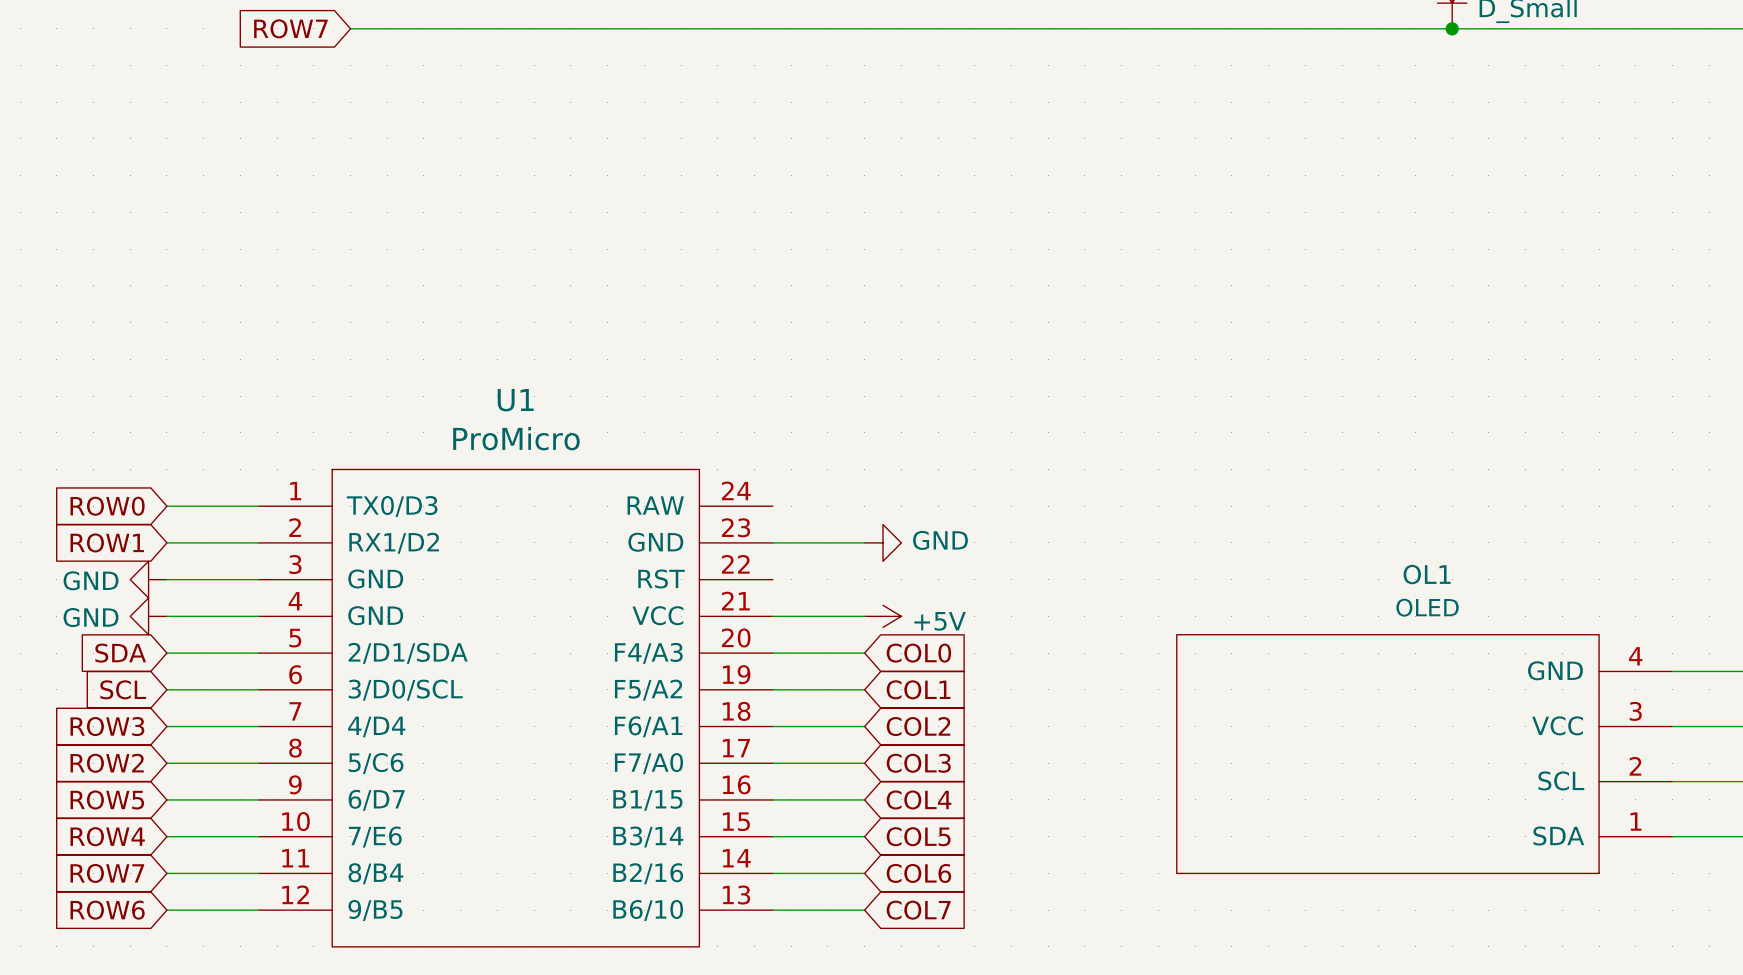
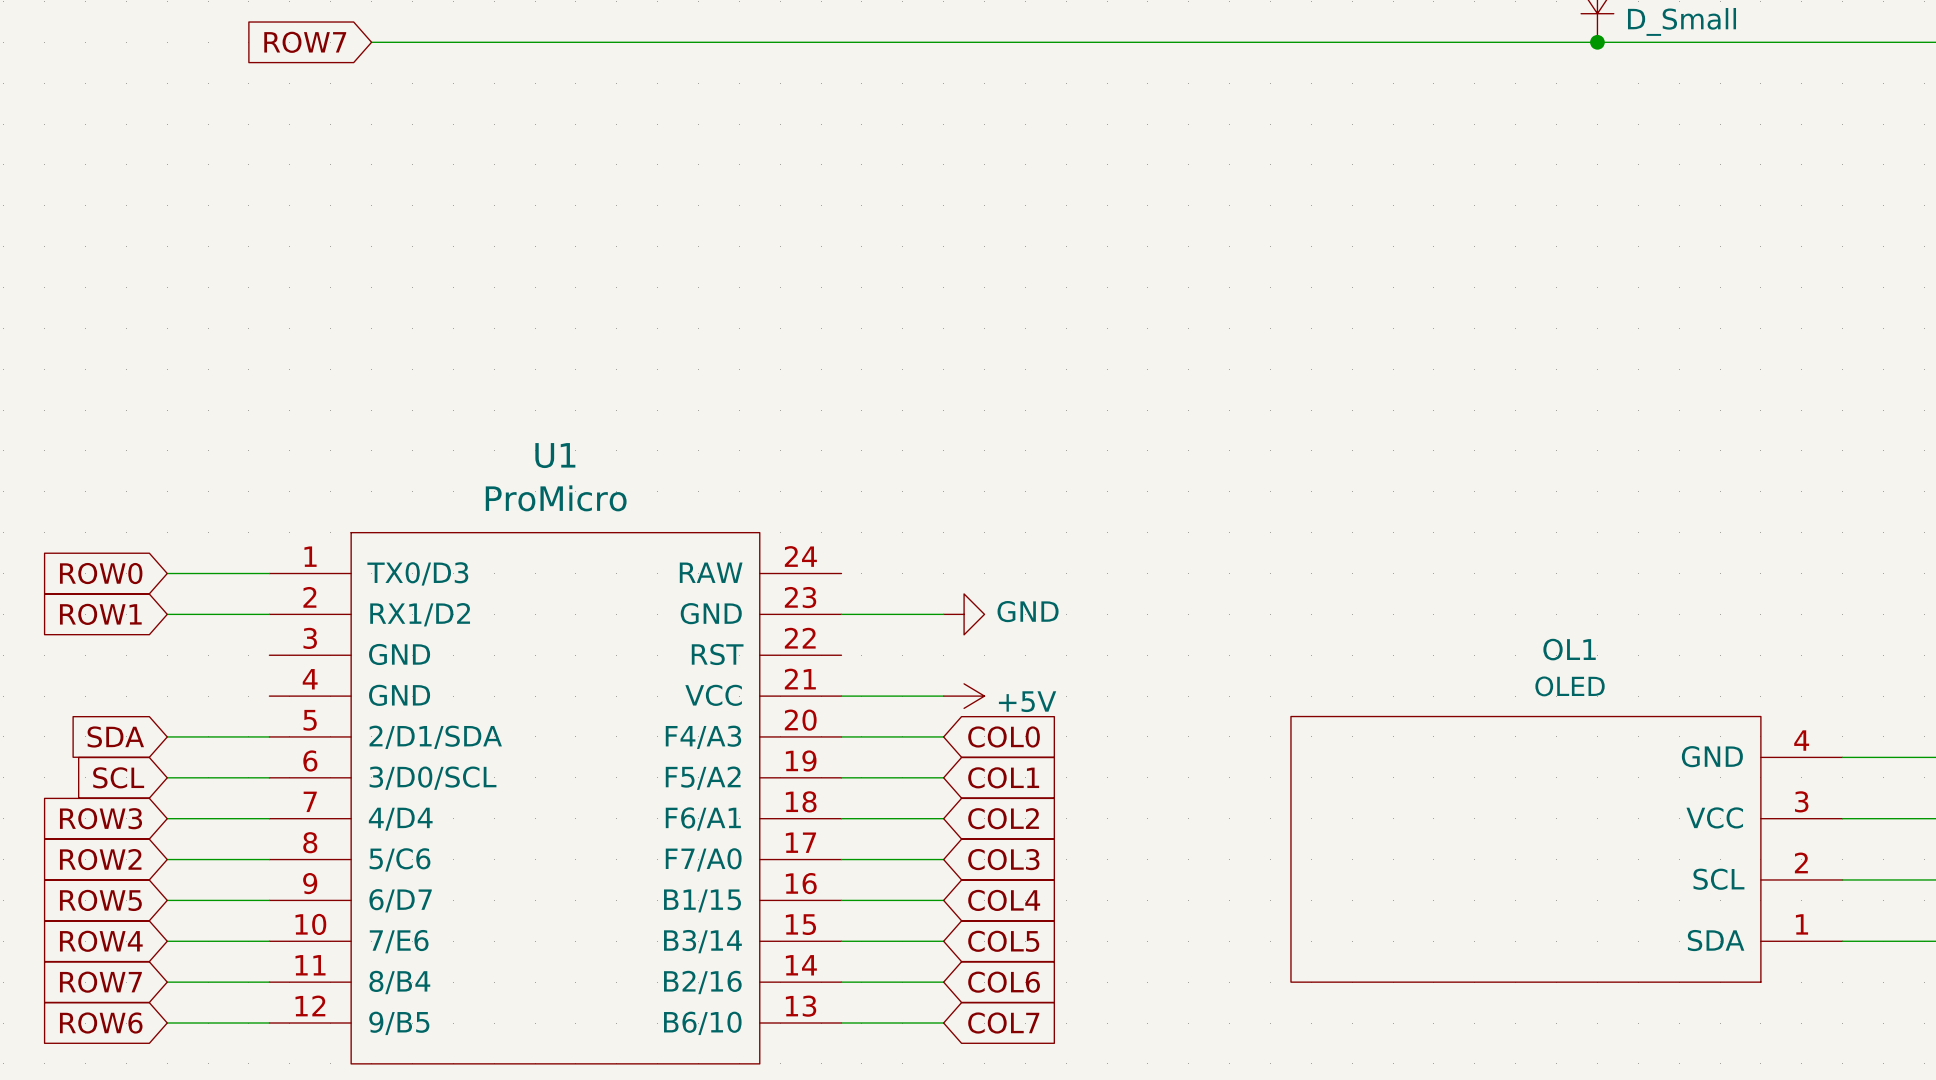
power symbol: GND (148, 579) -> none
wire: (166, 579) (258, 579) -> none
power symbol: GND (148, 616) -> none
wire: (166, 616) (258, 616) -> none

